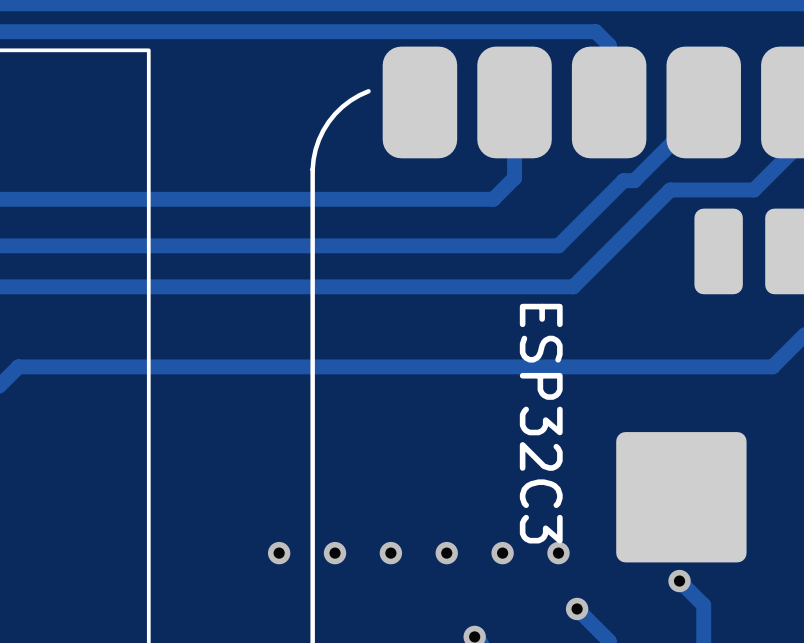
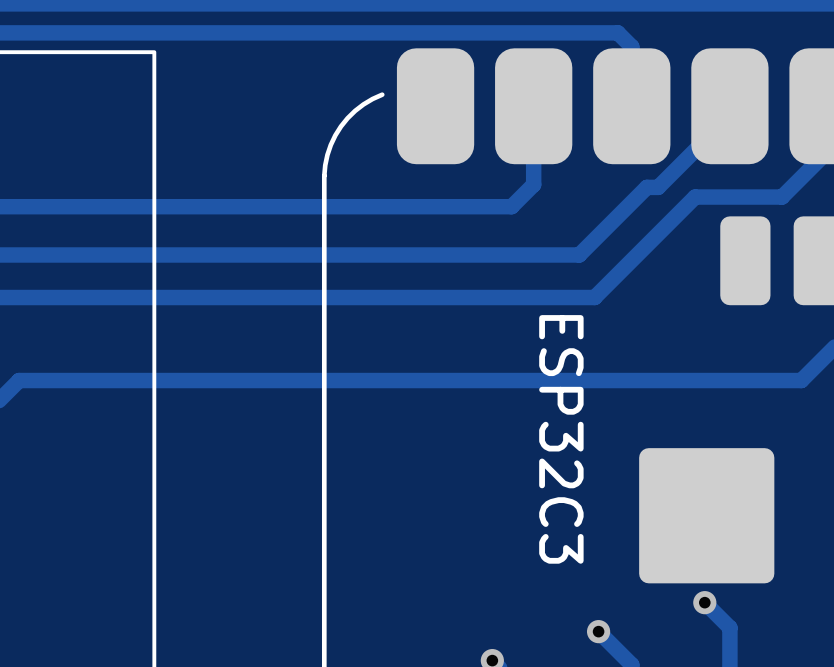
via: (279, 553) -> none
via: (335, 553) -> none
via: (390, 553) -> none
via: (446, 553) -> none
via: (502, 553) -> none
via: (558, 553) -> none

